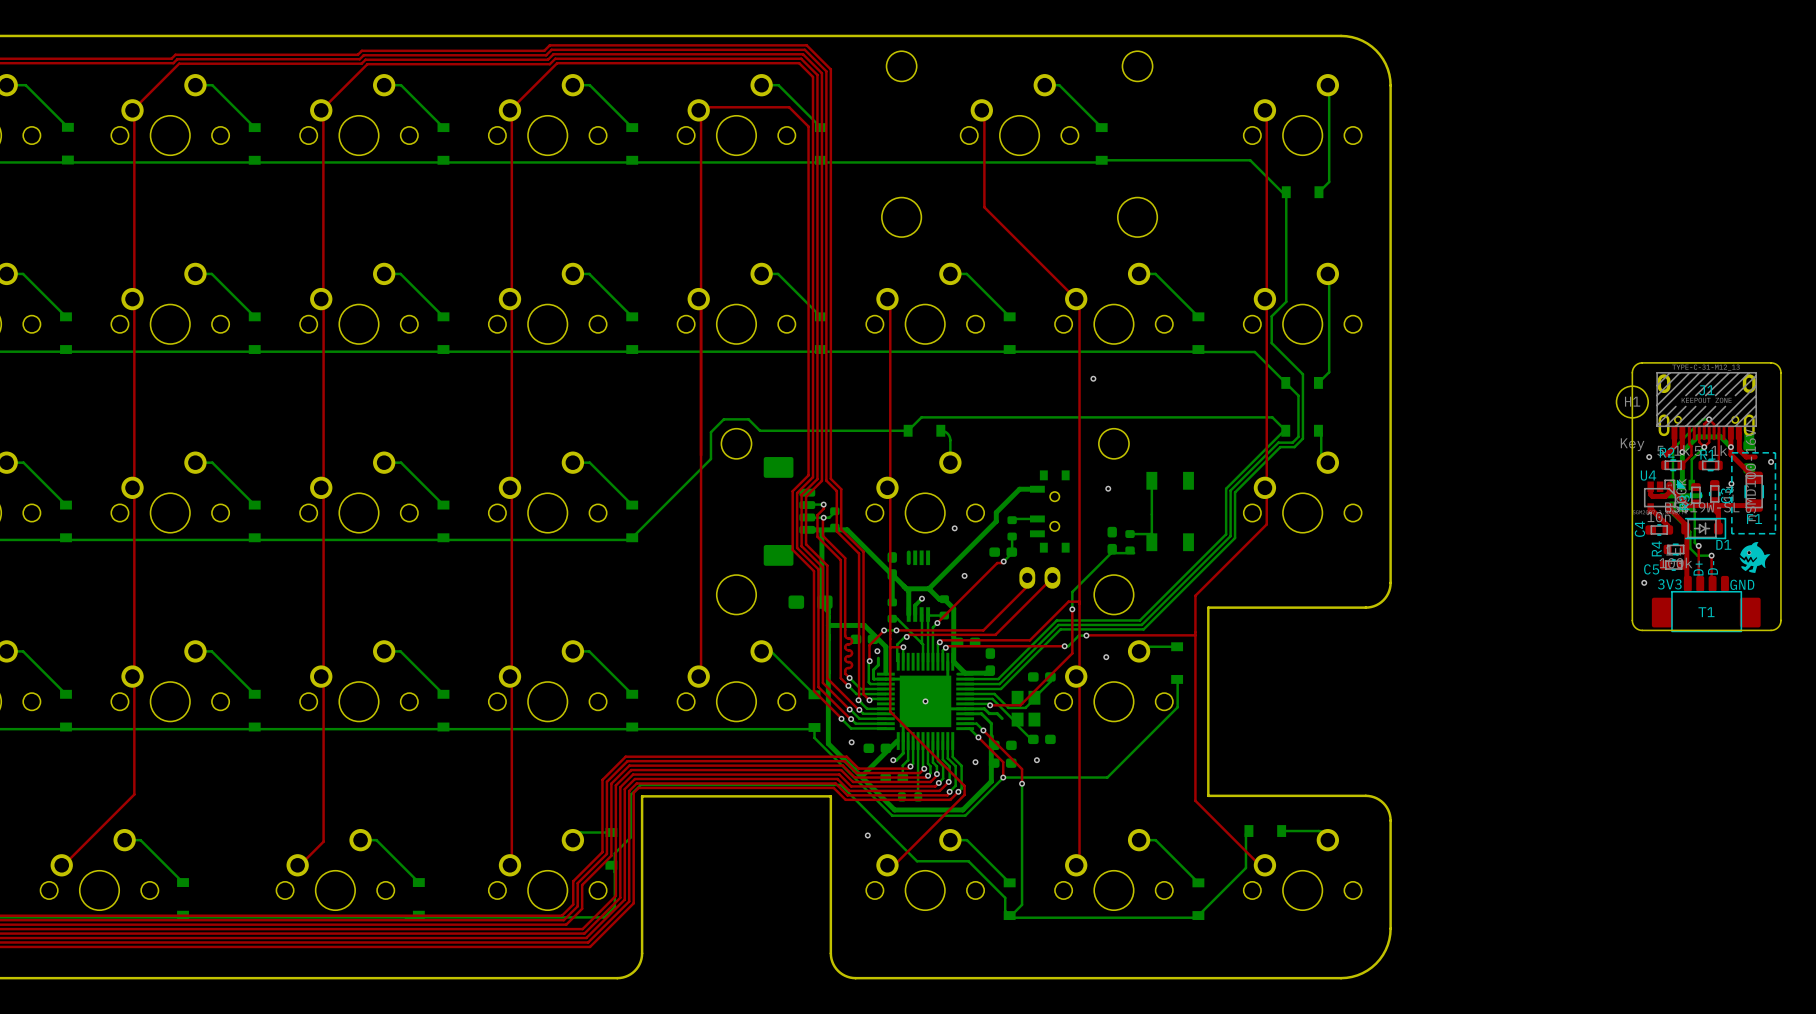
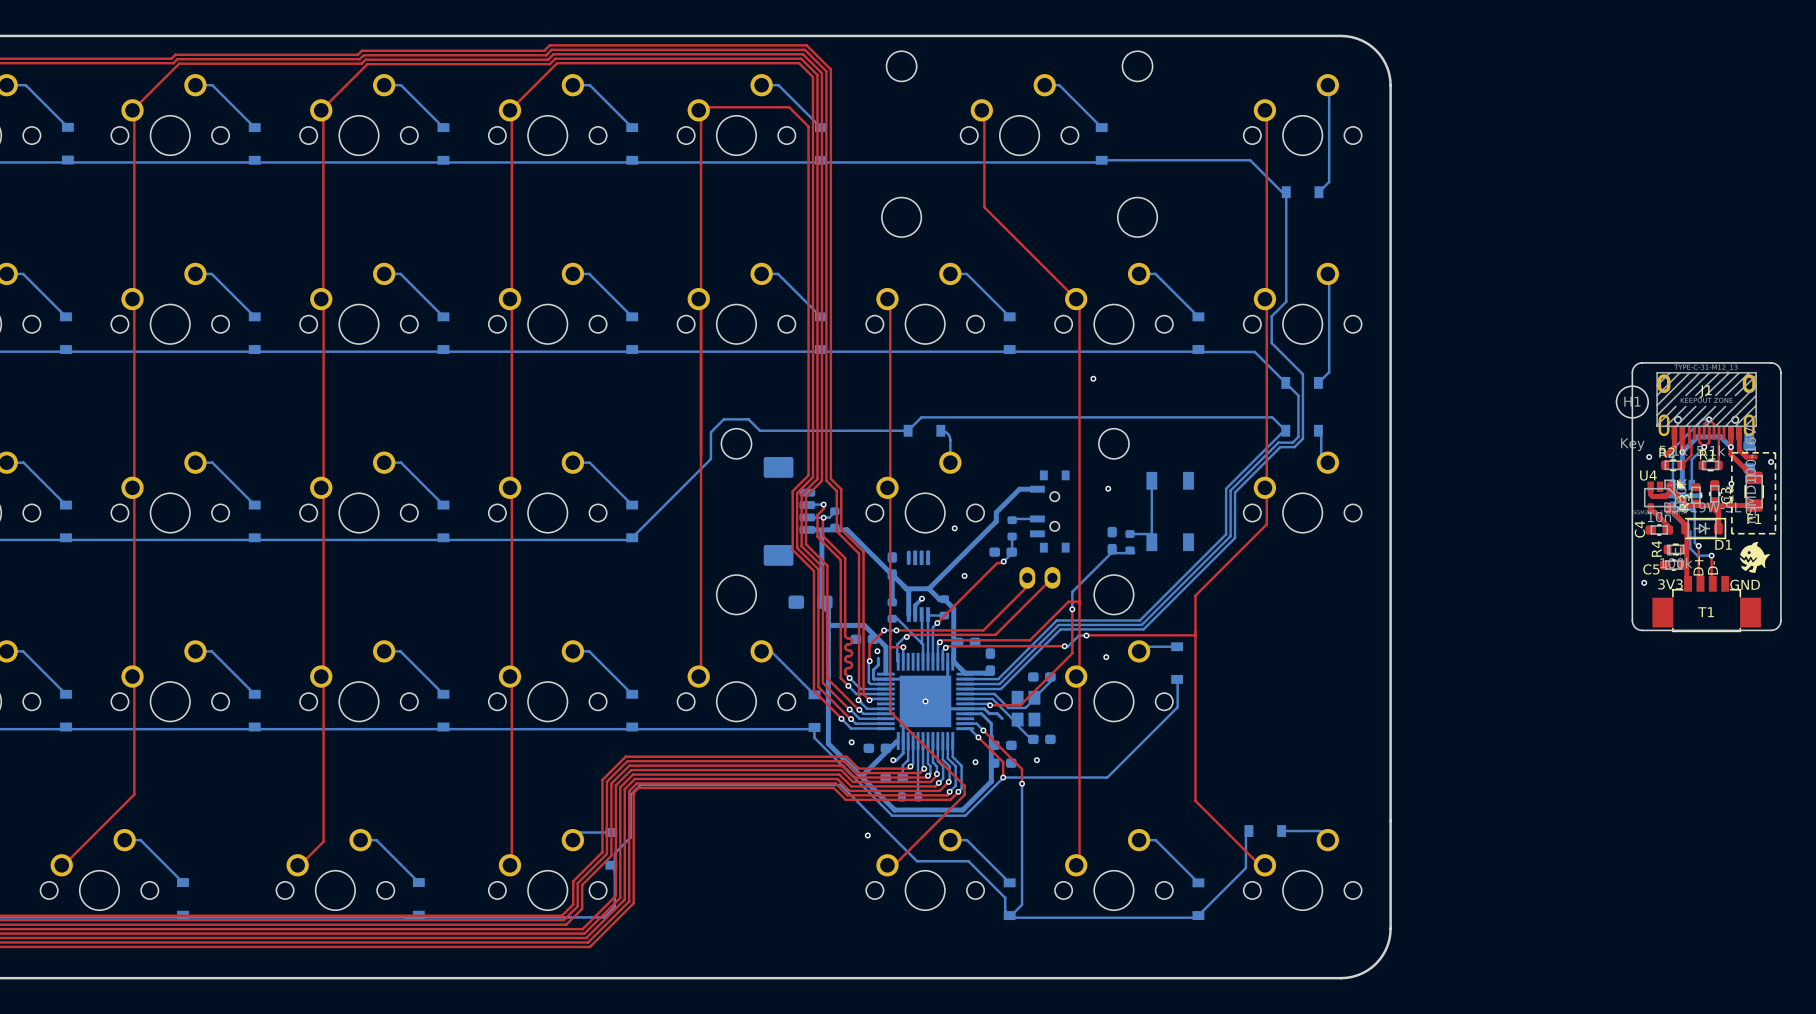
T1 footprint: [1651, 575, 1761, 632] -> [1652, 575, 1761, 632]
board edge: (1390, 582) (1389, 591) (1383, 600) (1368, 607) (1208, 607) (1208, 795) (1368, 796) (1379, 799) (1385, 805) (1390, 820) -> (1390, 582) (1390, 820)
board edge: (617, 978) (632, 972) (638, 966) (641, 956) (642, 796) (830, 796) (830, 956) (834, 966) (840, 972) (855, 978) -> (617, 978) (855, 978)

